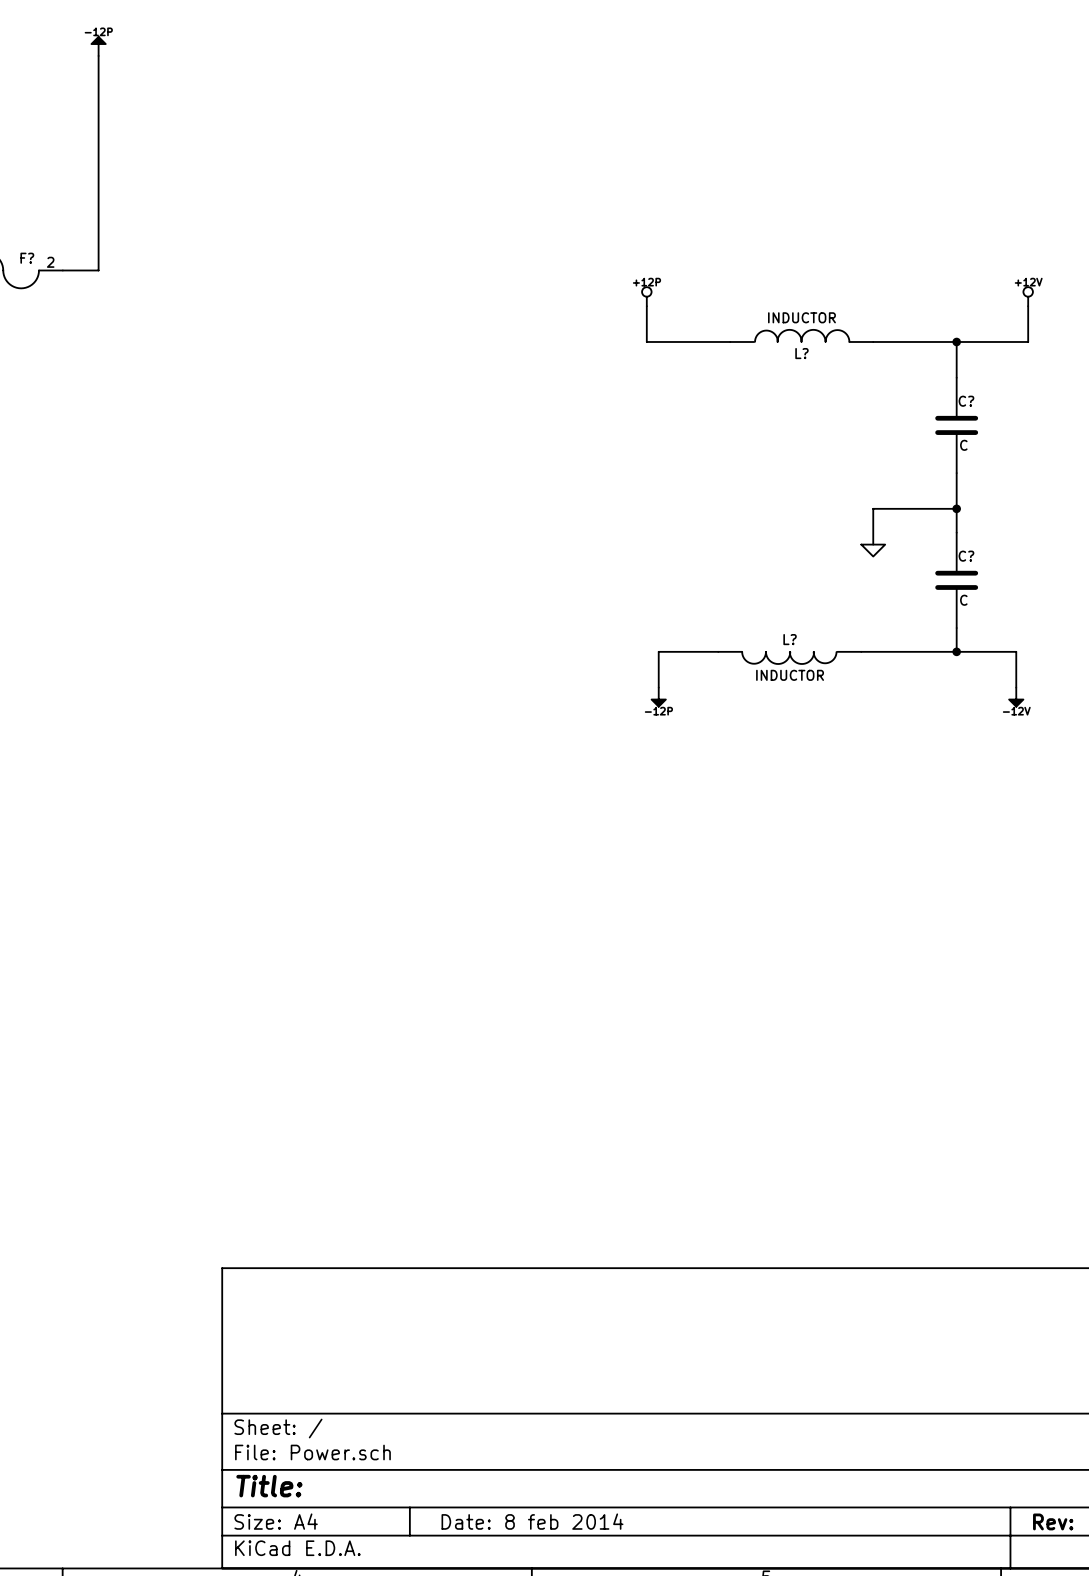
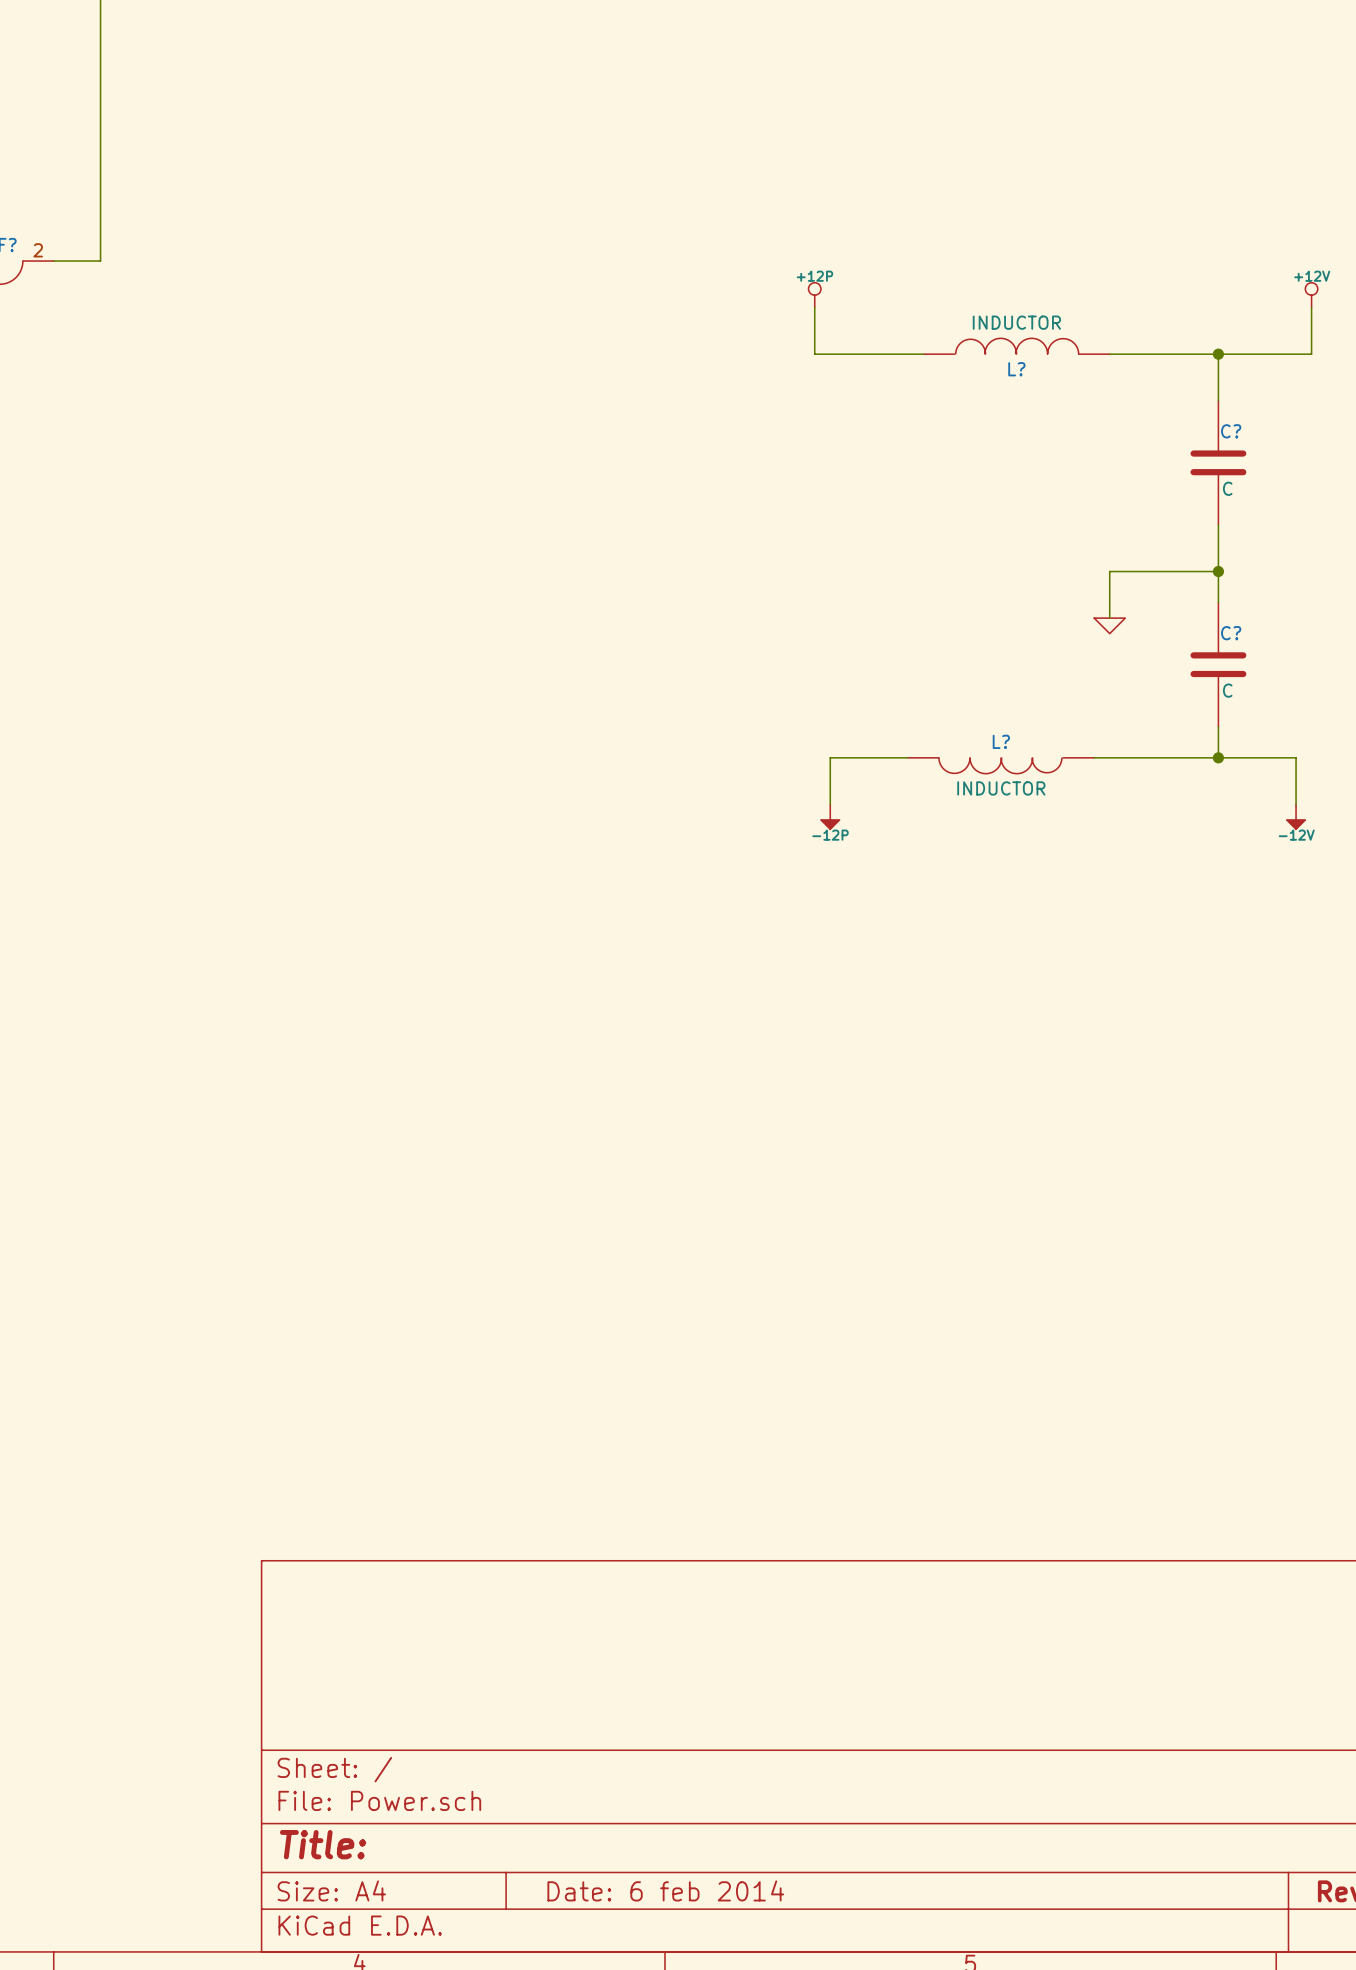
title block: Date: 8 feb 2014 (532, 1521) -> Date: 6 feb 2014 (665, 1890)

